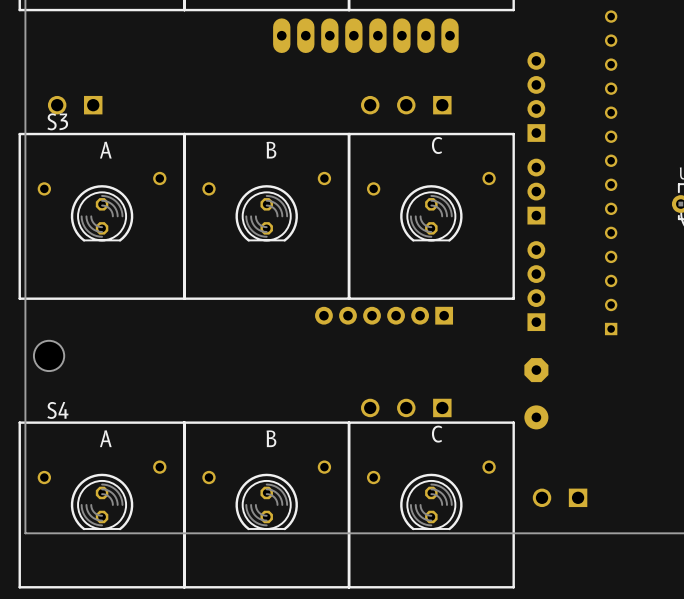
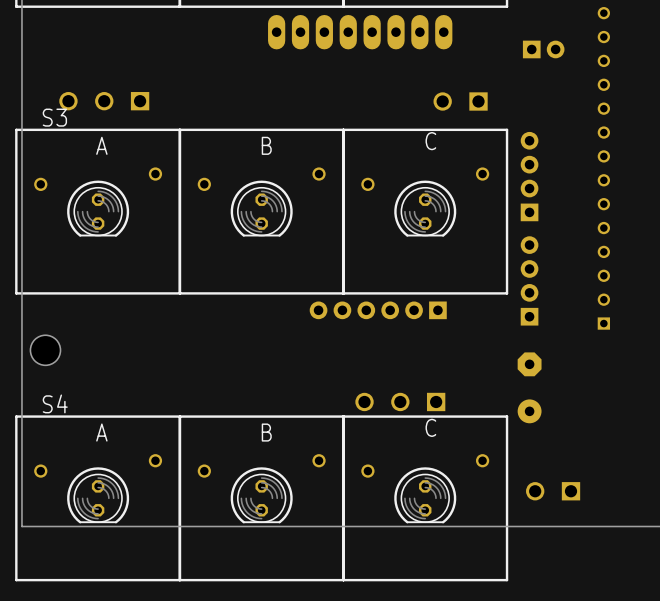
part: none -> (543, 49)
part position: (536, 96) -> (529, 176)
part: (75, 105) -> none
part: none -> (104, 101)
part: (406, 105) -> none
part: none -> (460, 101)
part: (536, 191) -> none

